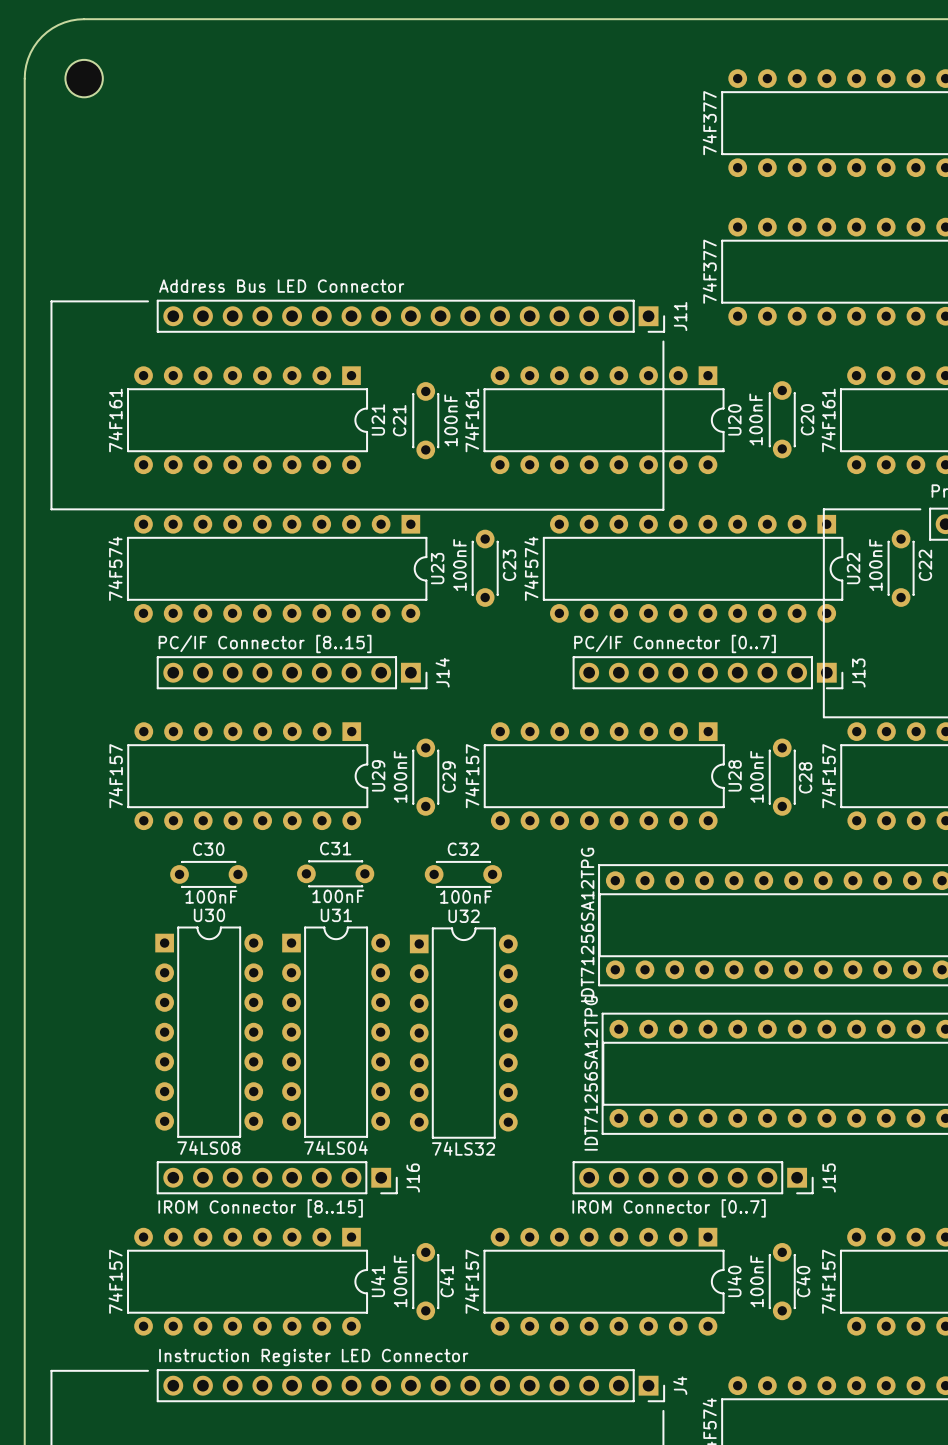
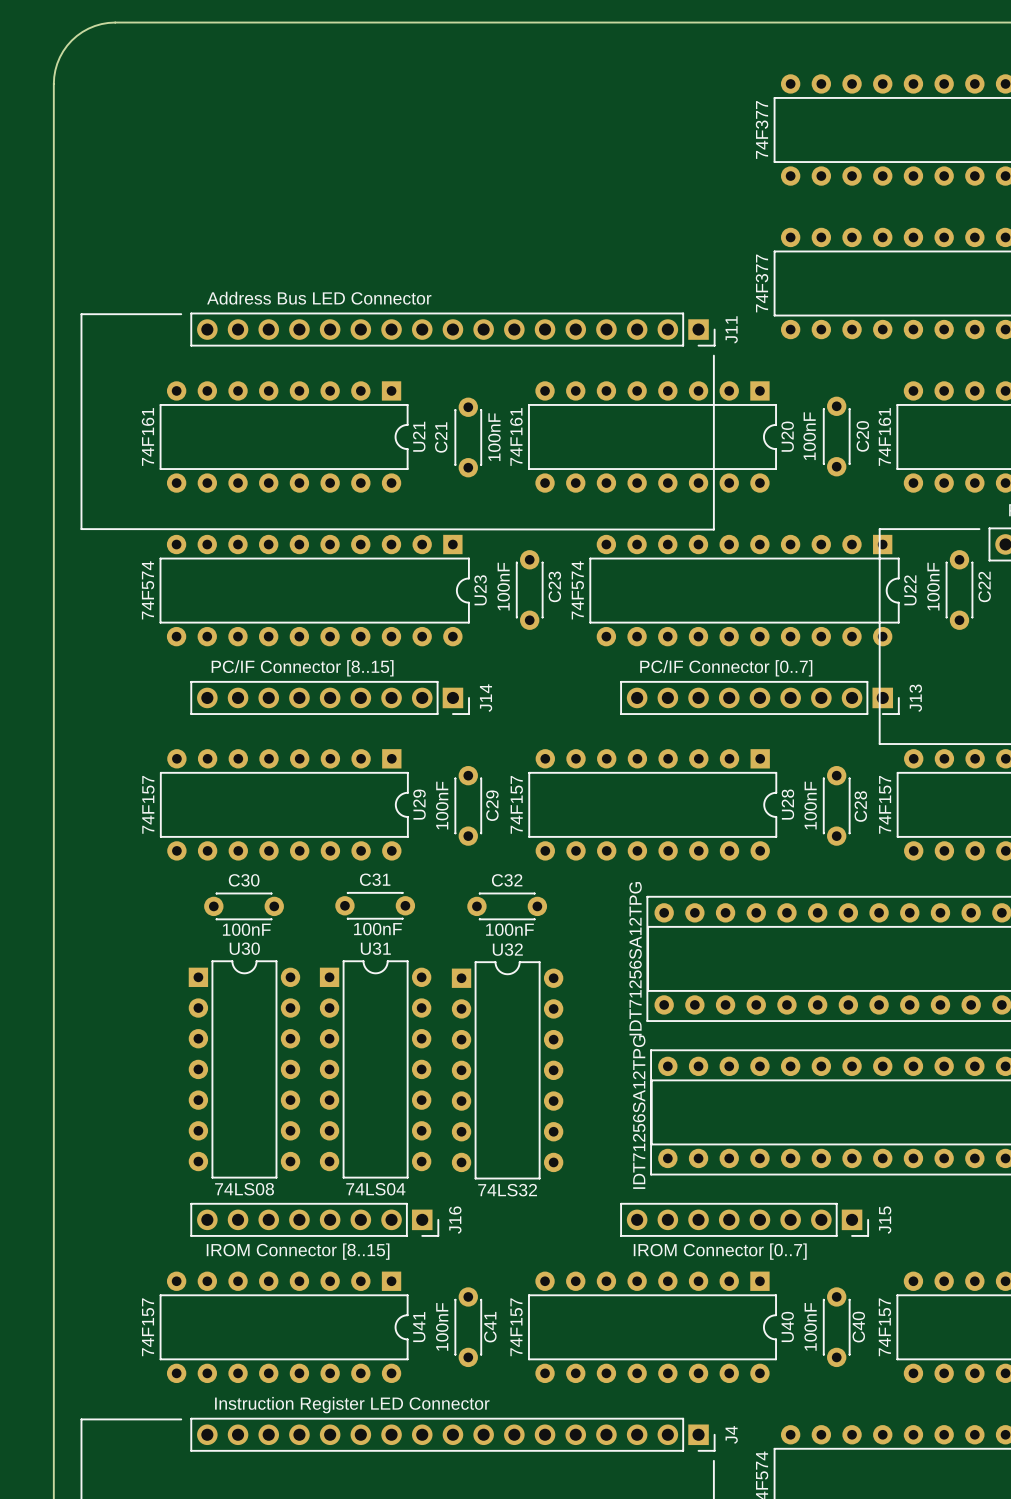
part: (84, 78) -> none

